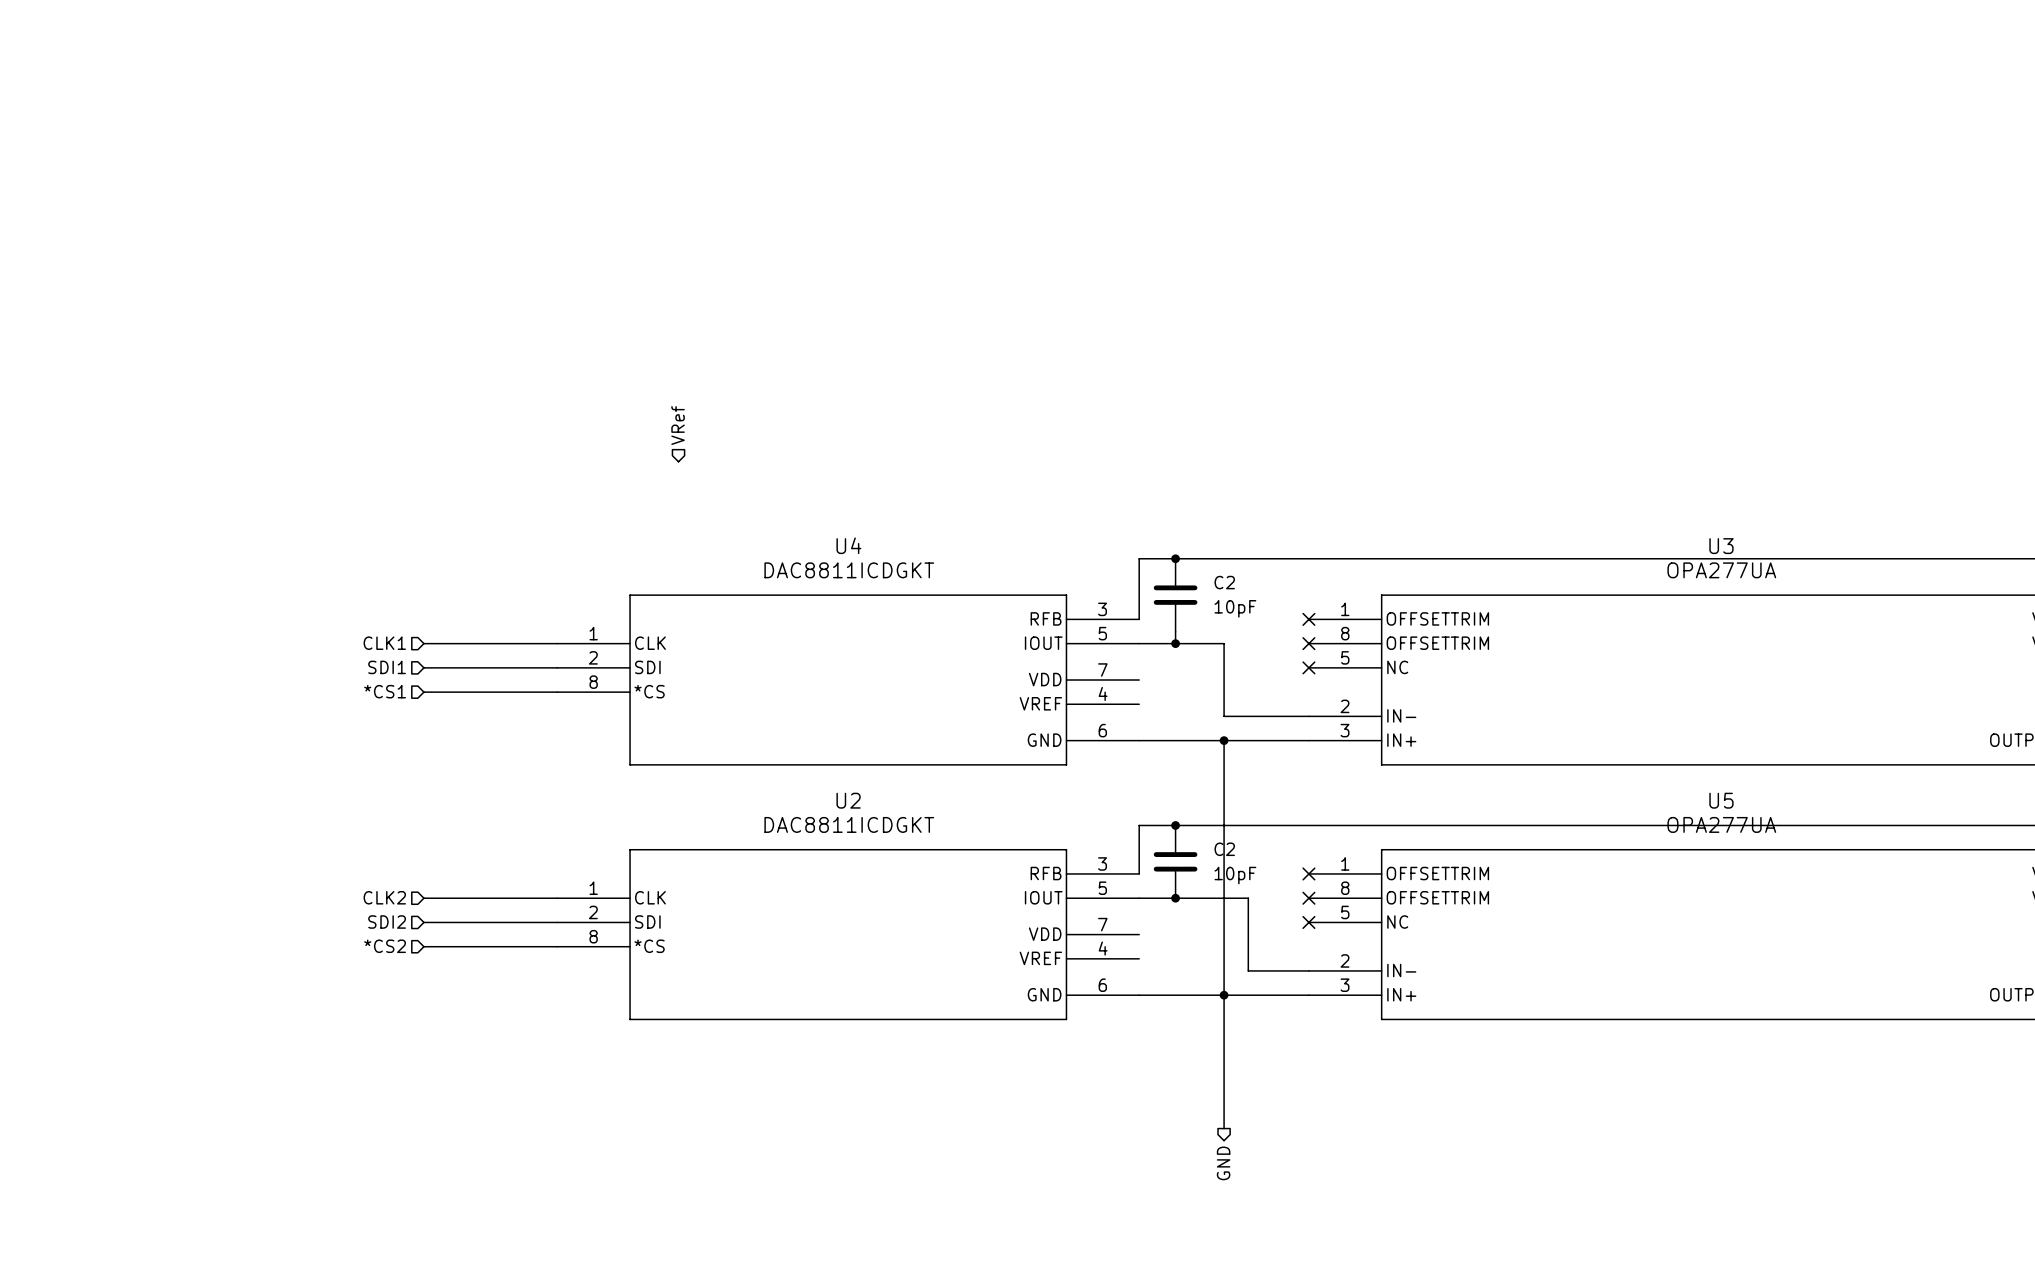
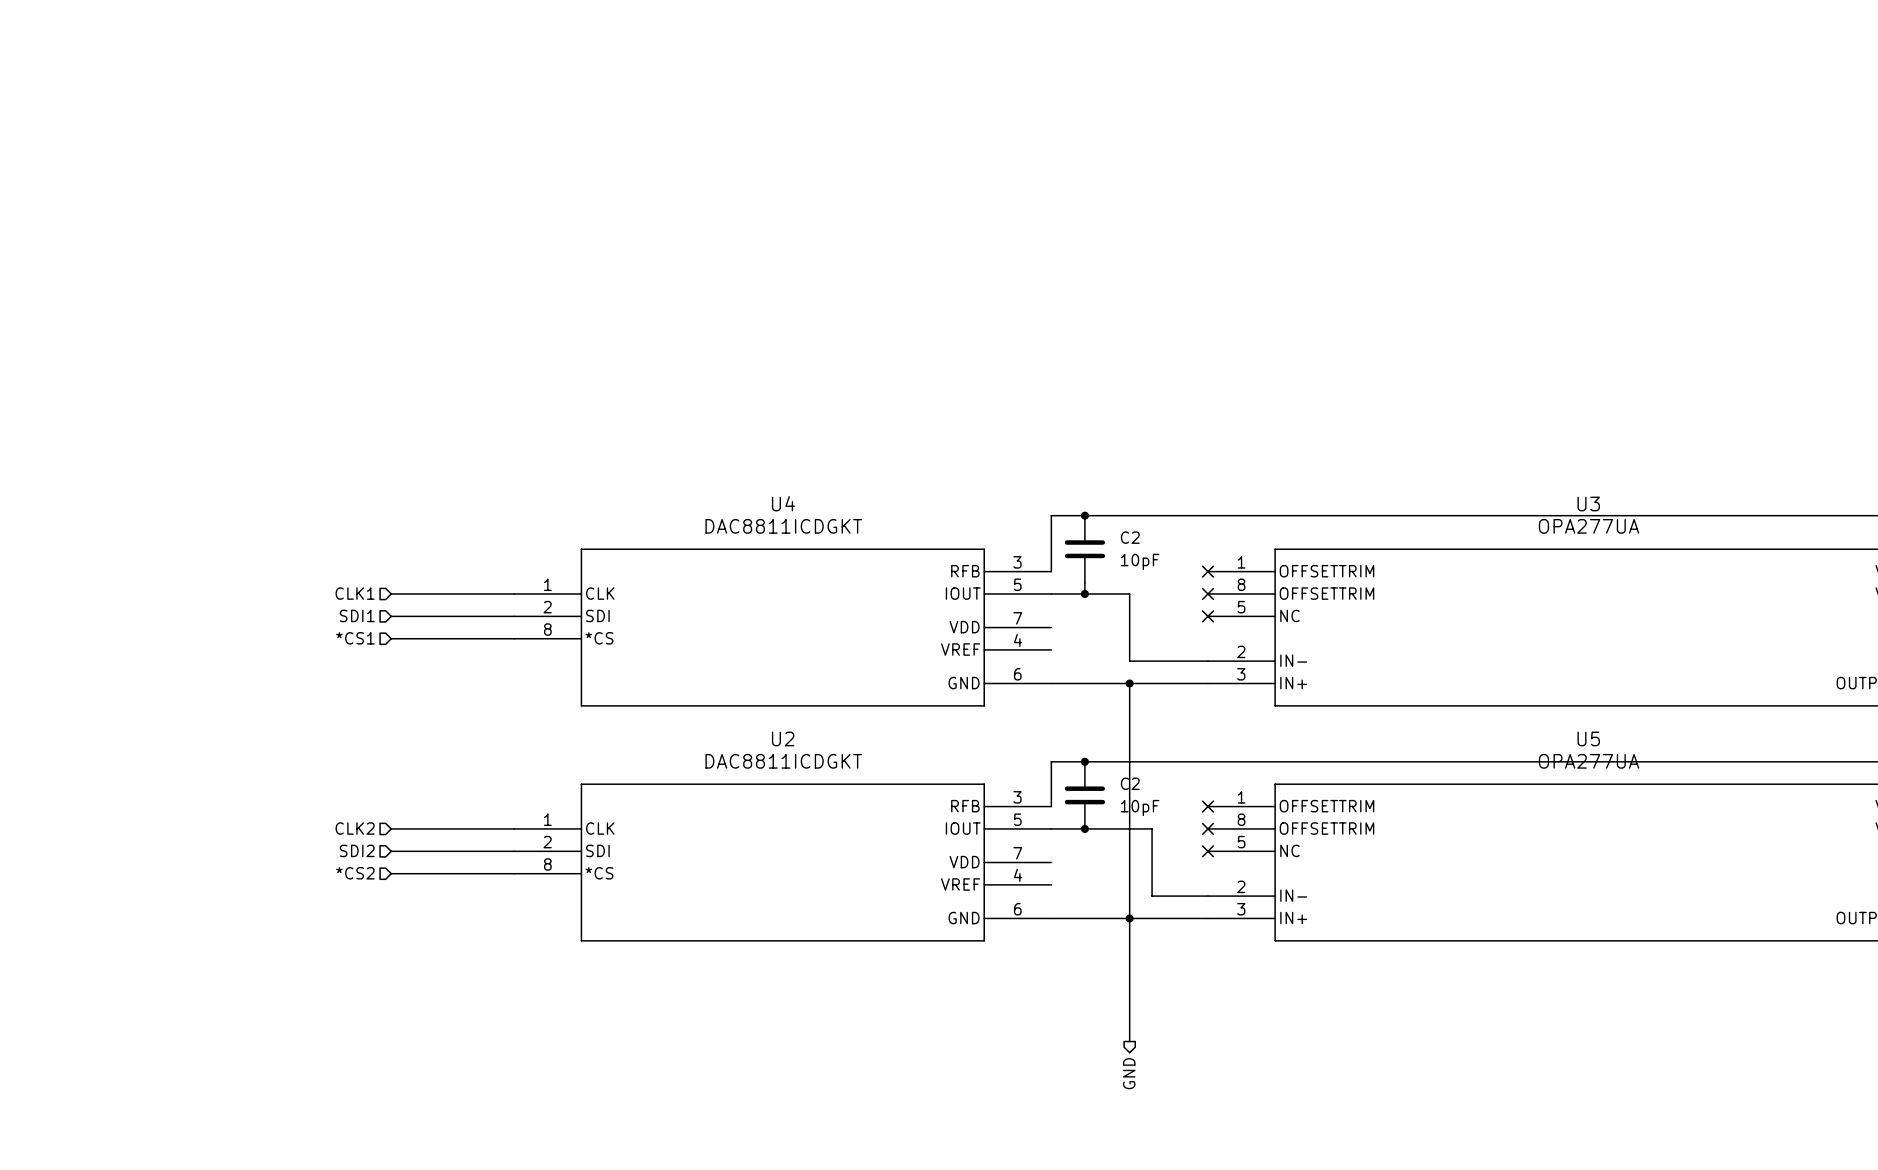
hierarchical label: VRef (678, 425) -> none

